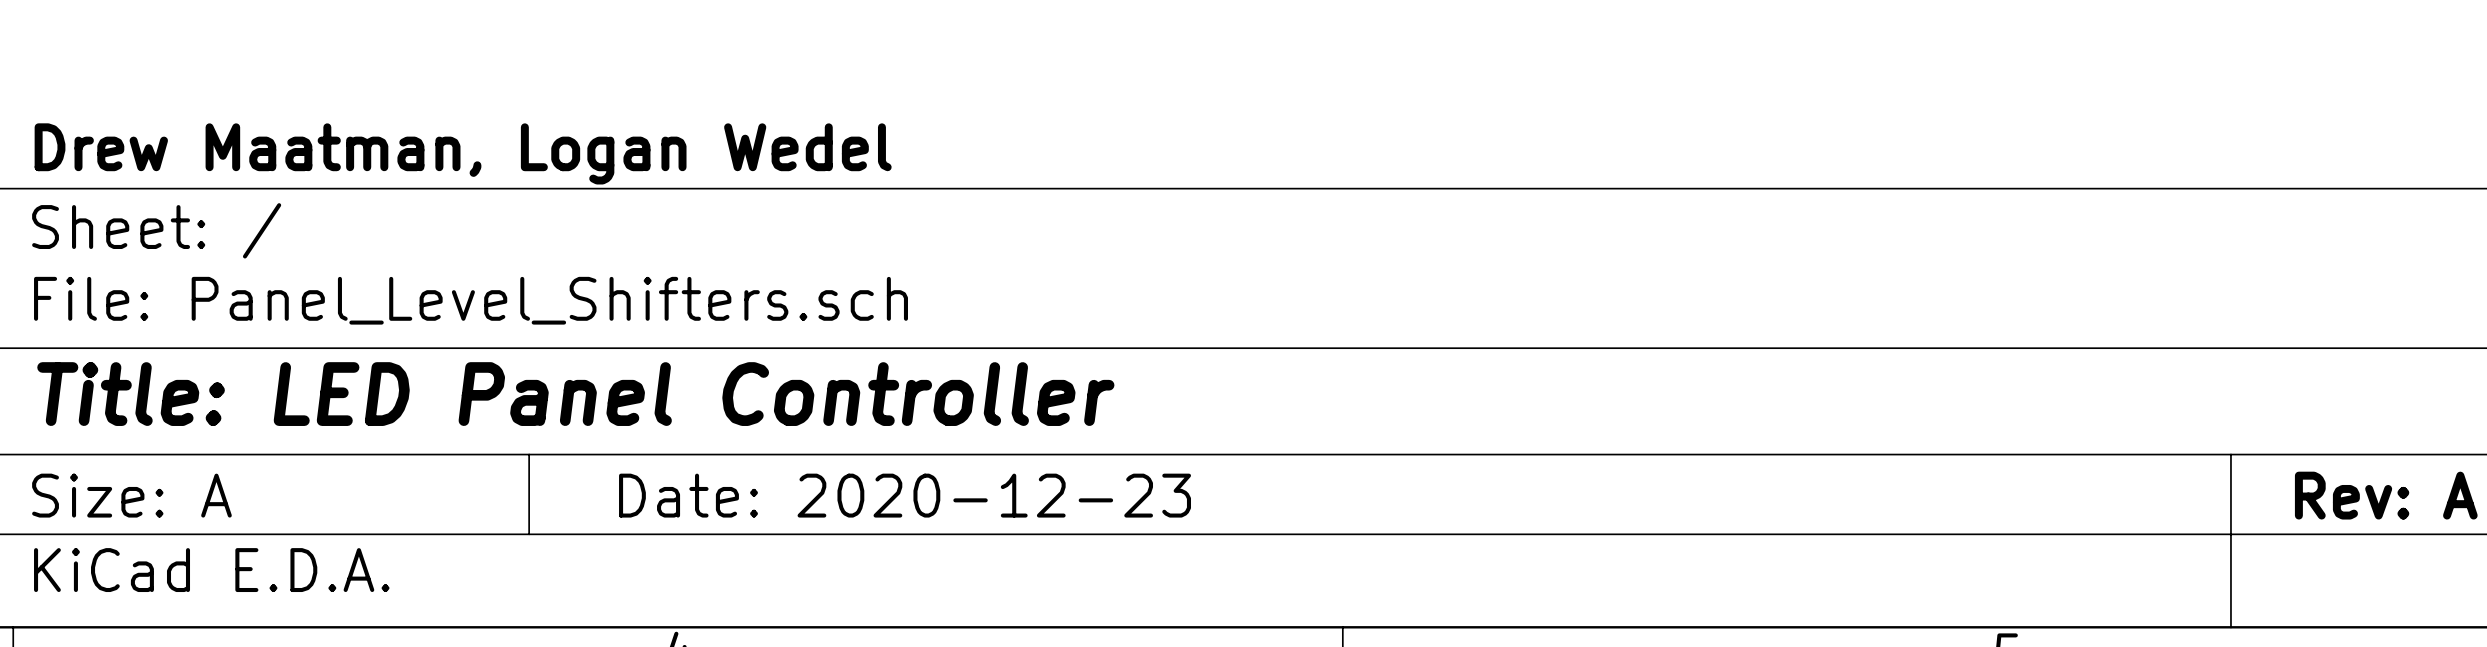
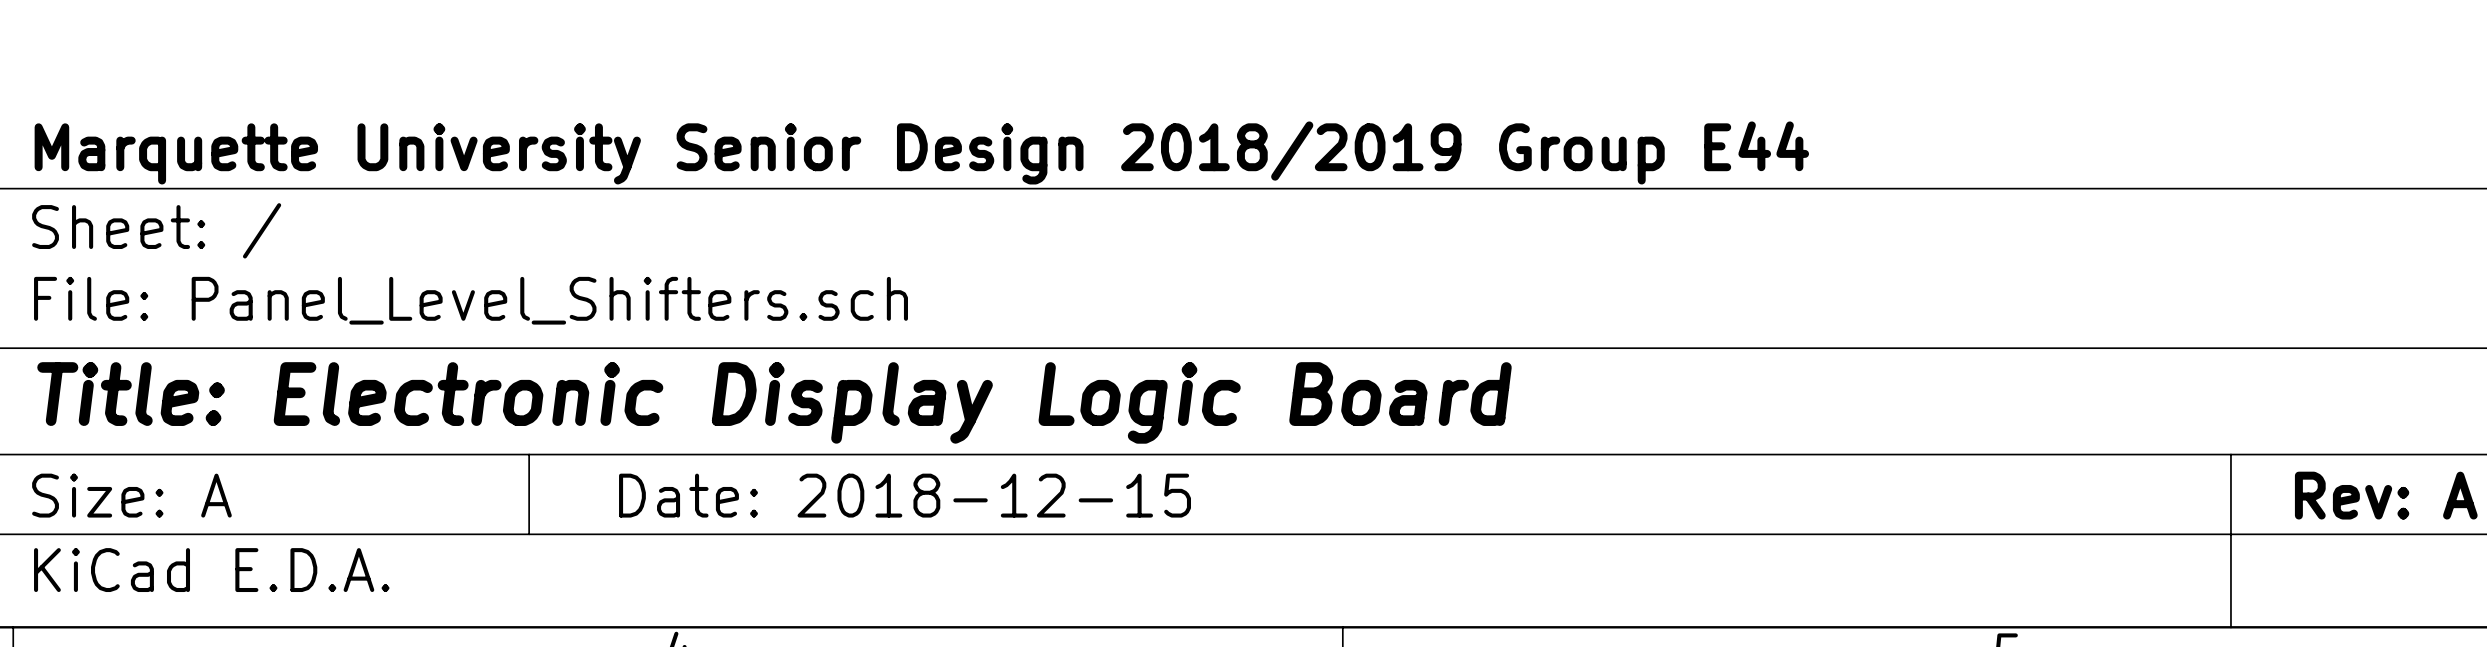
title block: Drew Maatman, Logan Wedel (463, 153) -> Marquette University Senior Design 2018/2019 Group E44 (921, 152)
title block: Title: LED Panel Controller (575, 394) -> Title: Electronic Display Logic Board (774, 402)
title block: Date: 2020-12-23 (905, 495) -> Date: 2018-12-15 (905, 495)

